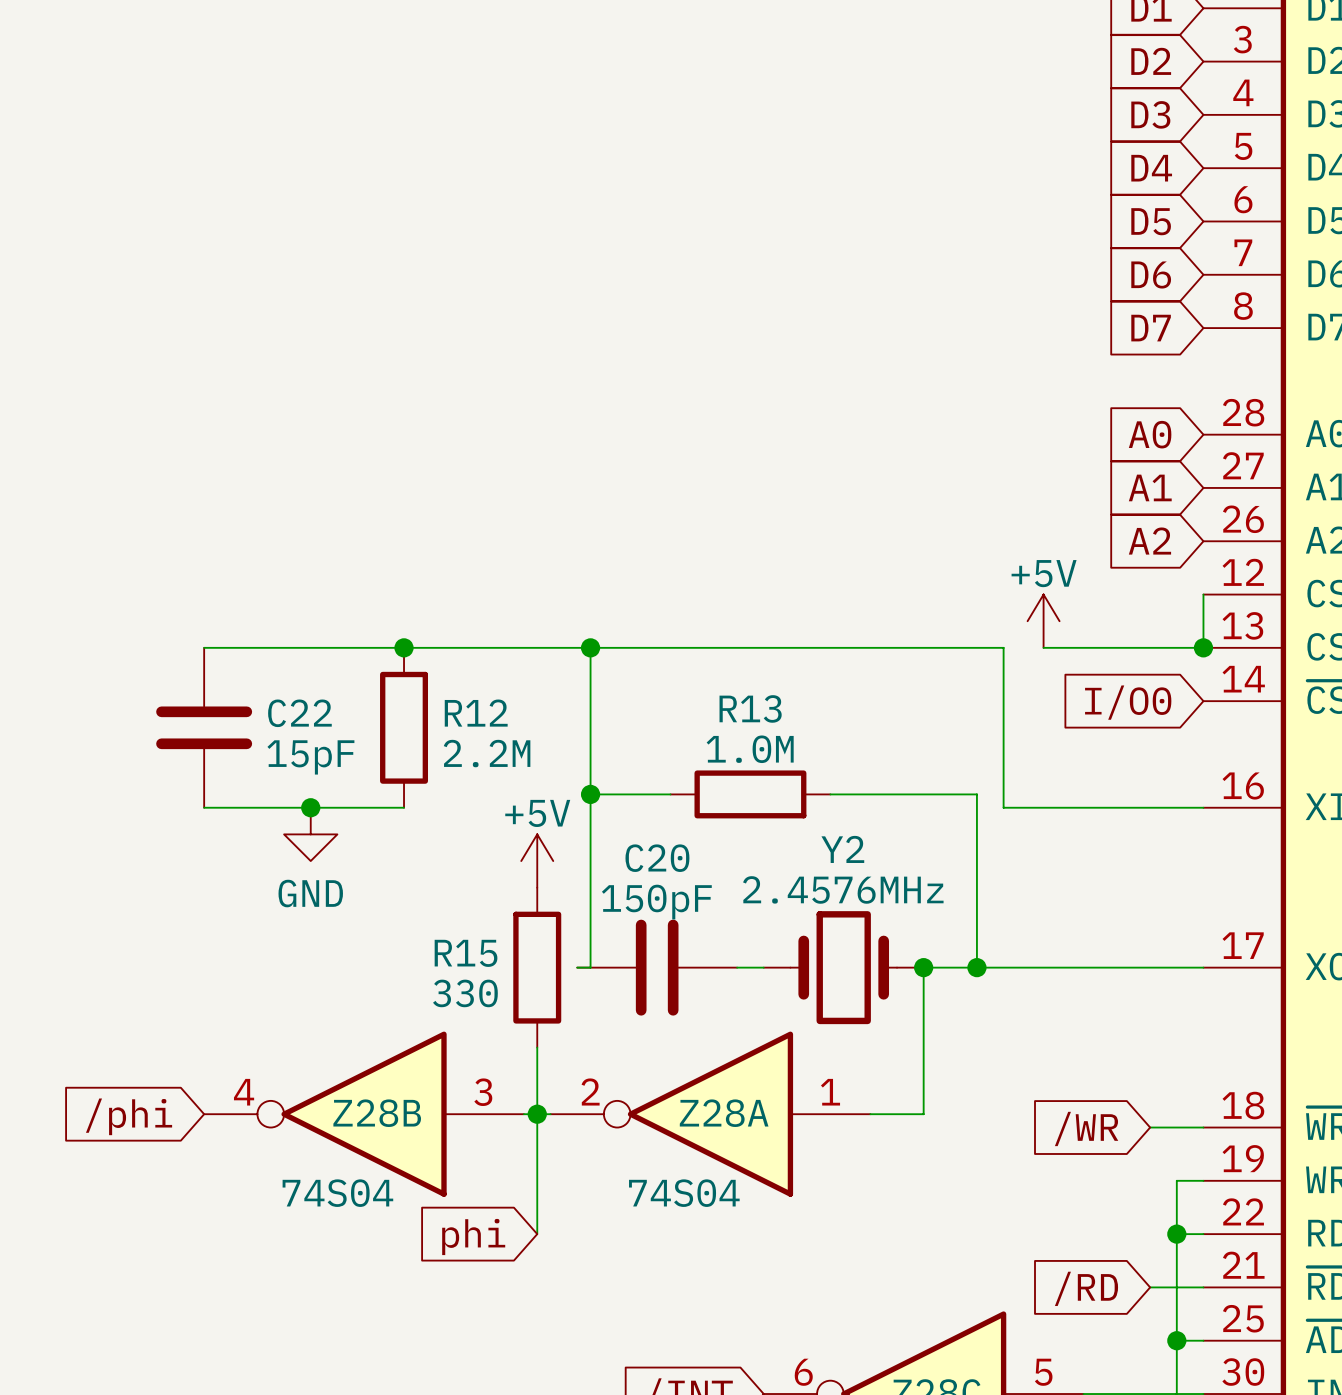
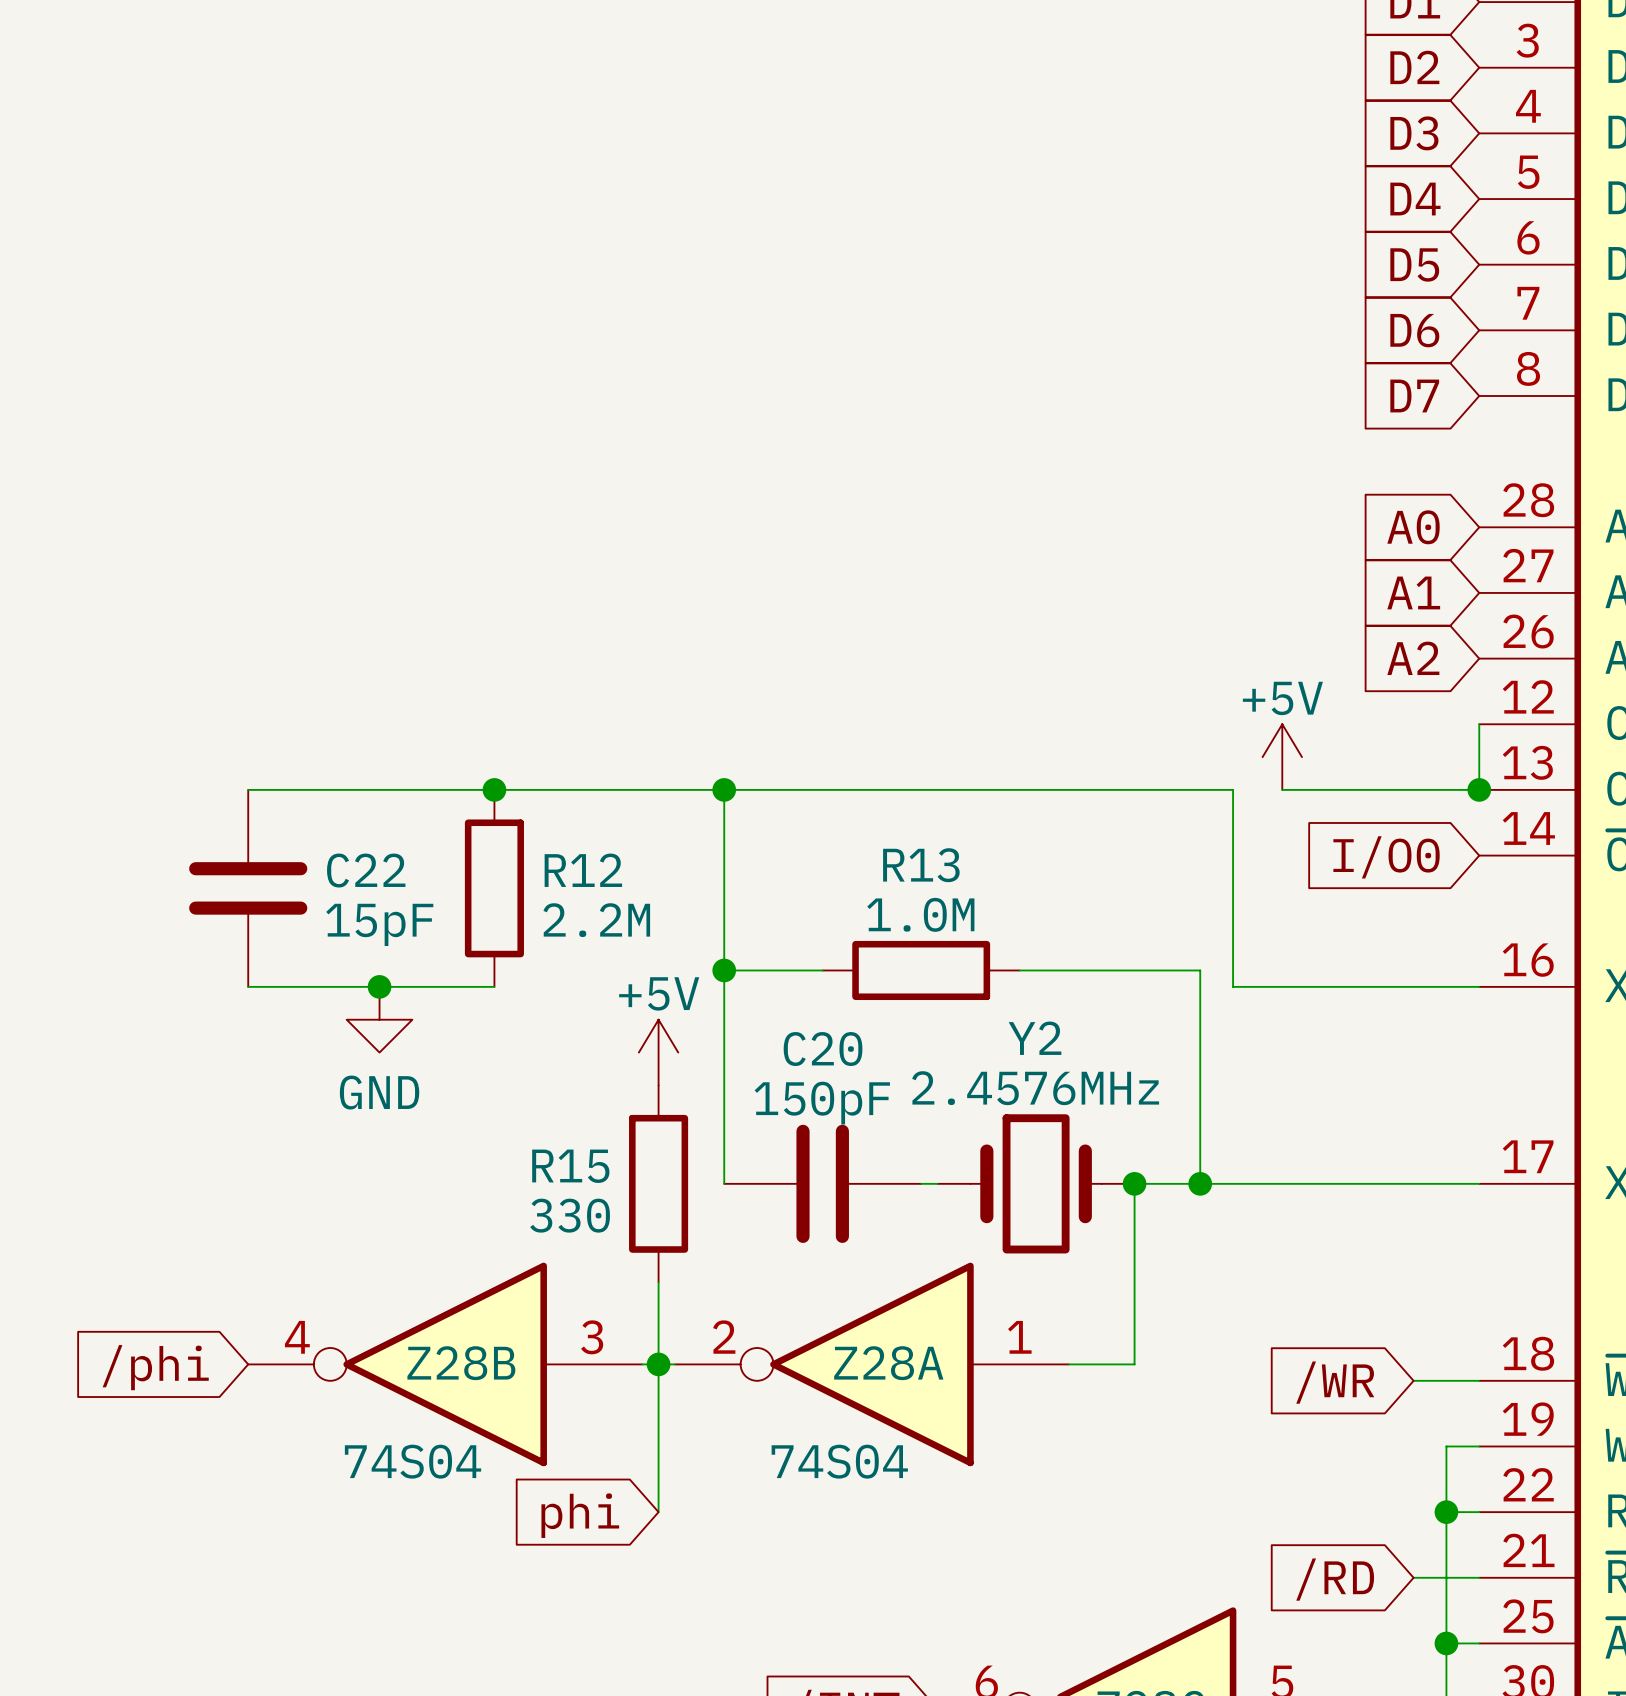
wire: (577, 967) (590, 967) -> none
C20 position: (657, 967) -> (822, 1183)

